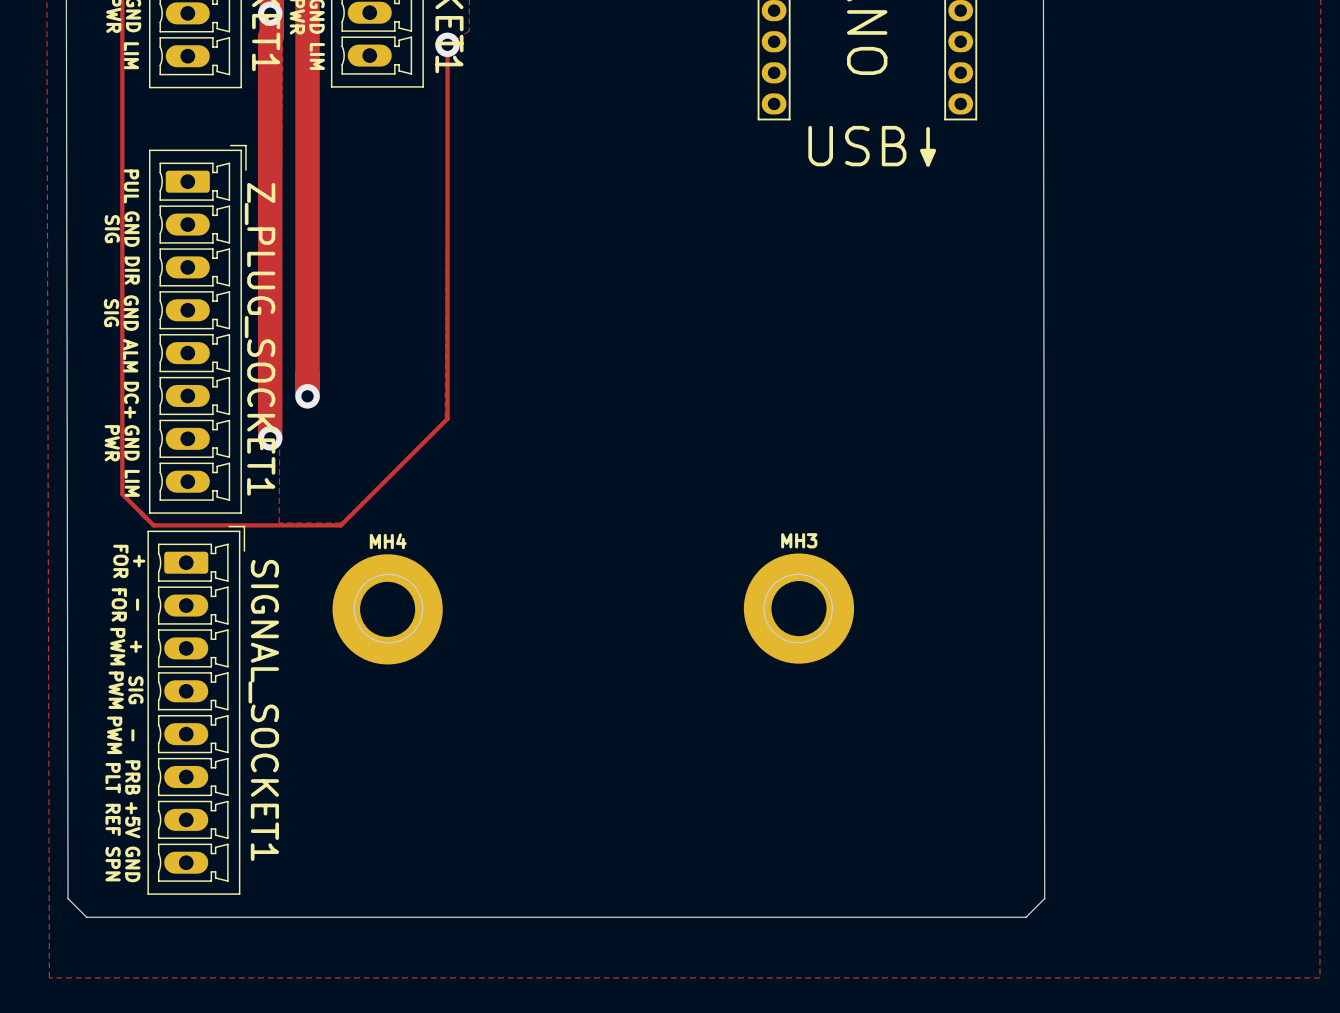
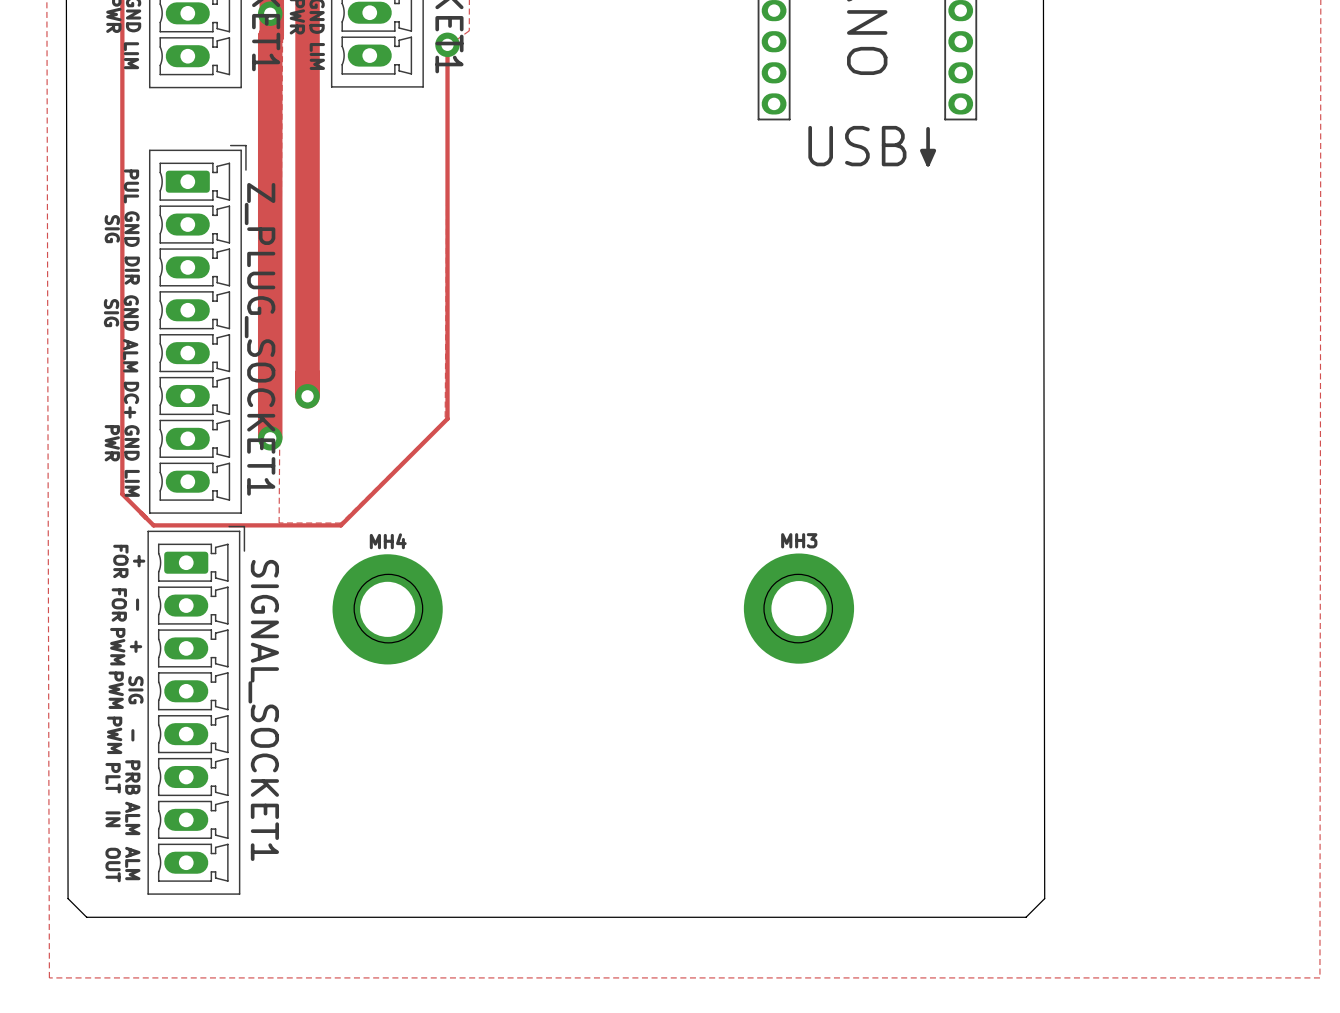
text: REF (113, 819) -> IN (113, 819)
text: +5V (132, 820) -> ALM (132, 818)
text: SPN (113, 864) -> OUT (113, 864)
text: GND (132, 864) -> ALM (132, 863)

